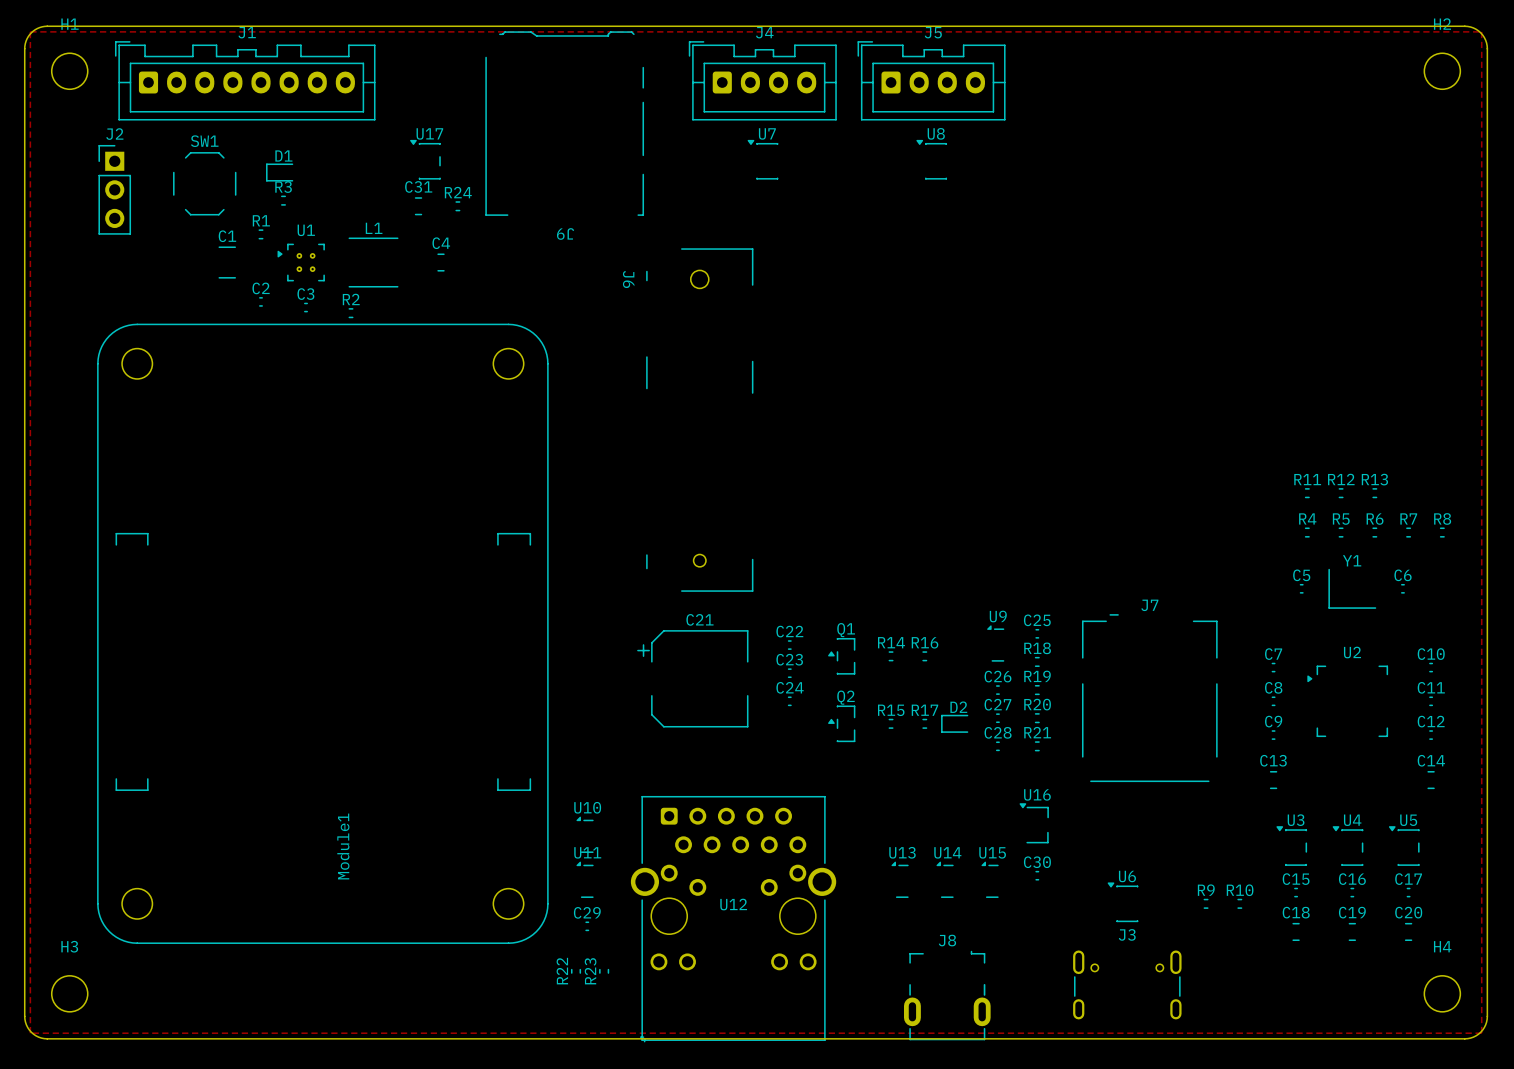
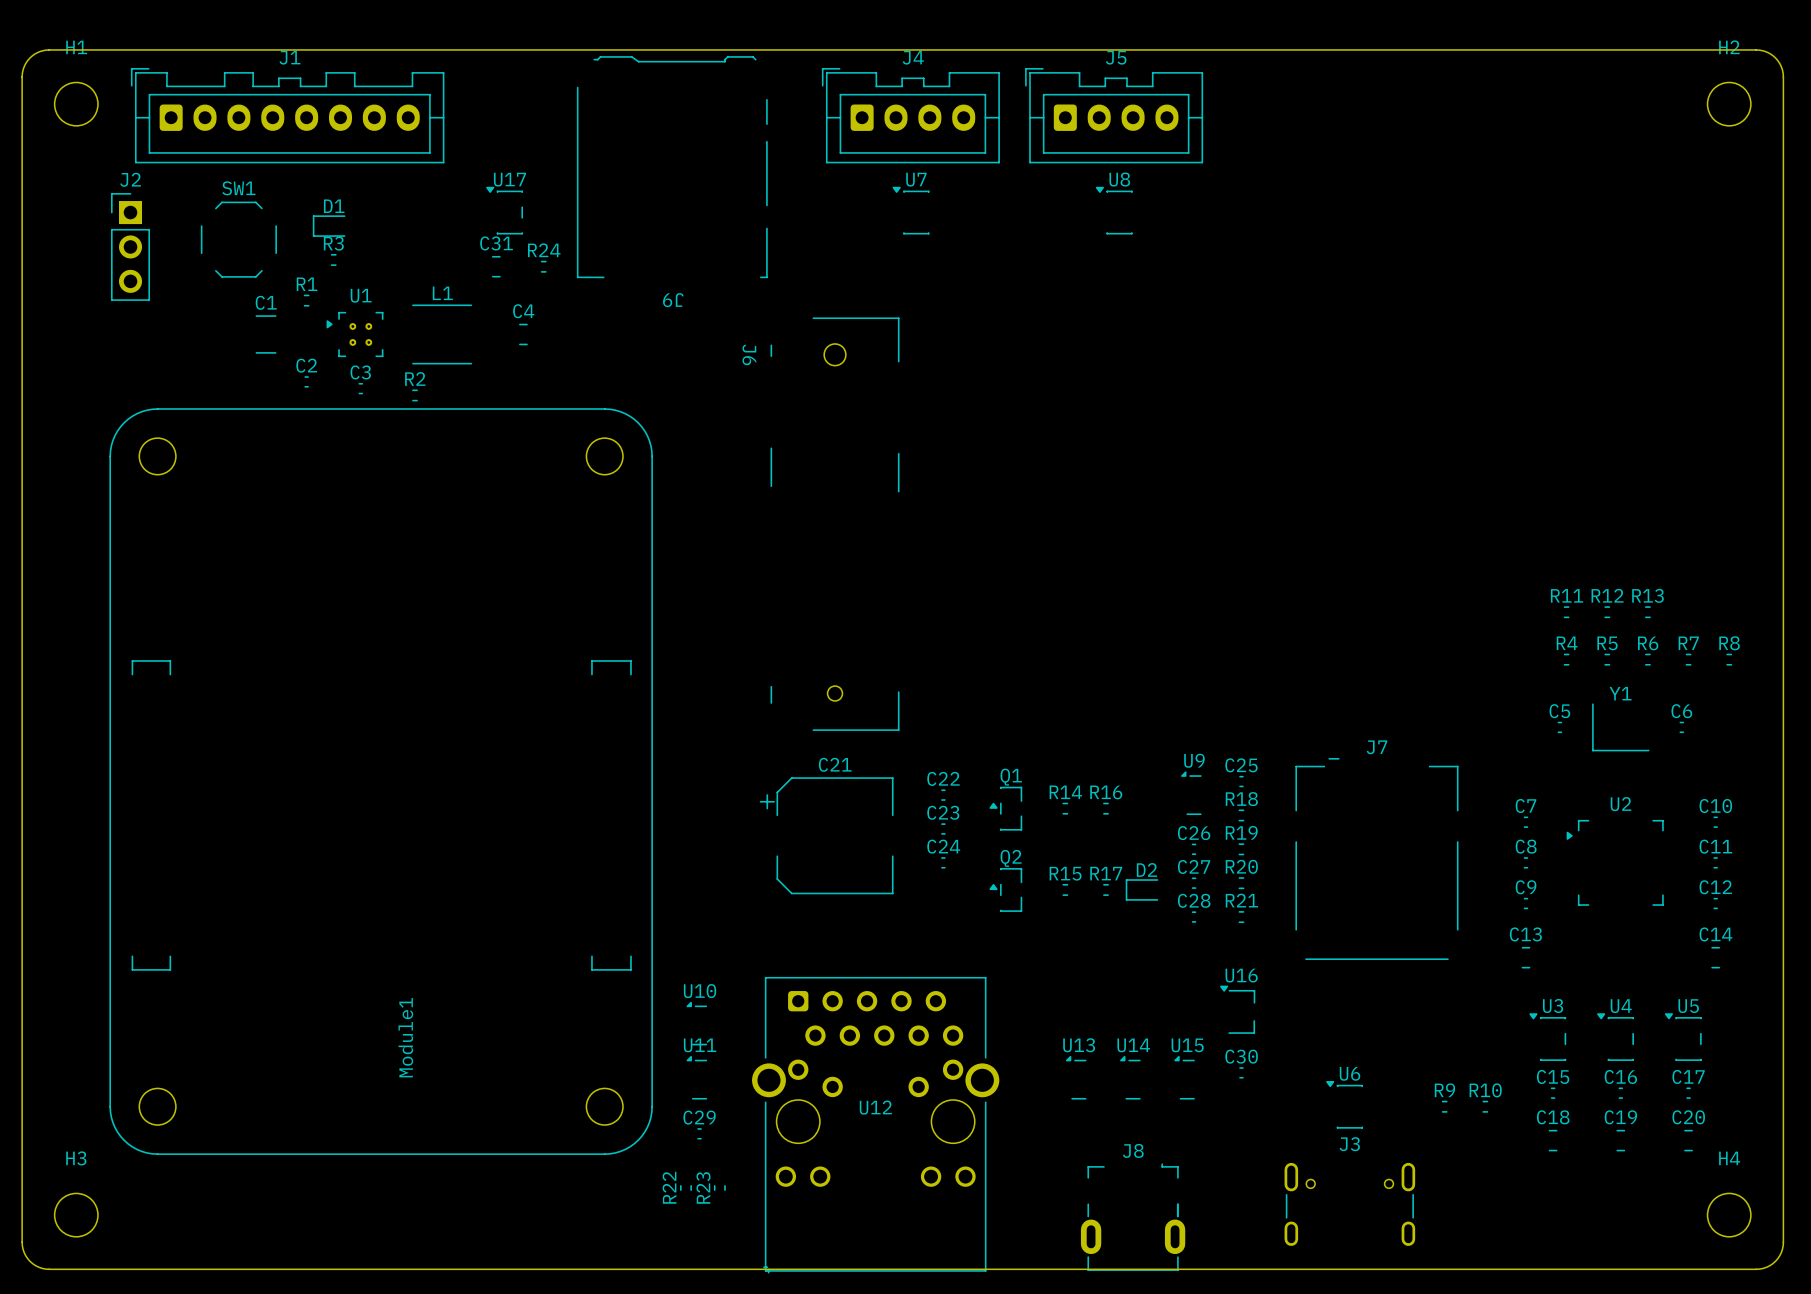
zone outline: (30, 31) (1481, 31) (1481, 1033) (30, 1033) (30, 31) -> none

